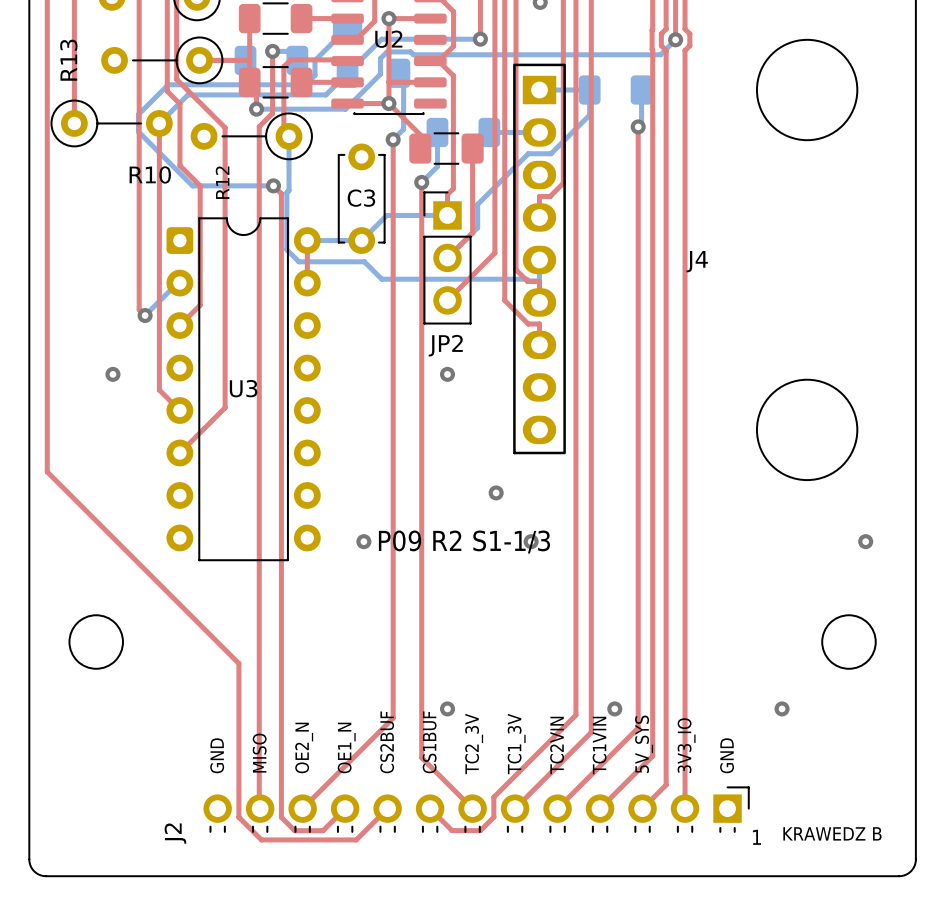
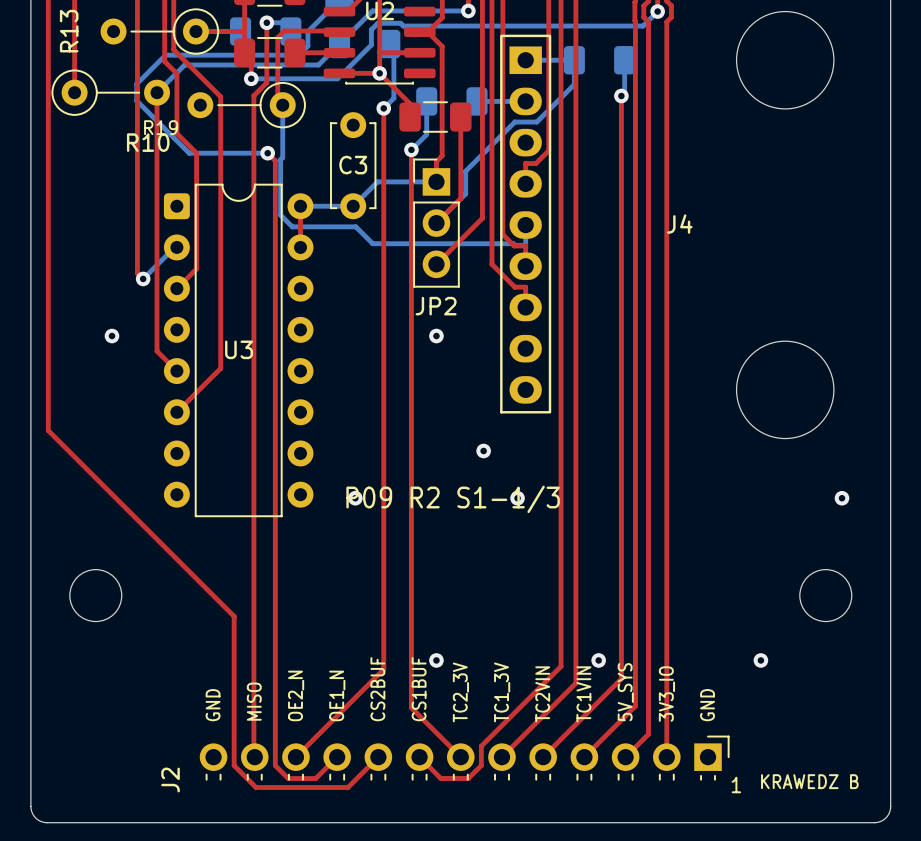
R19 name: none -> R19 (161, 127)
R12 name: R12 (222, 182) -> none

